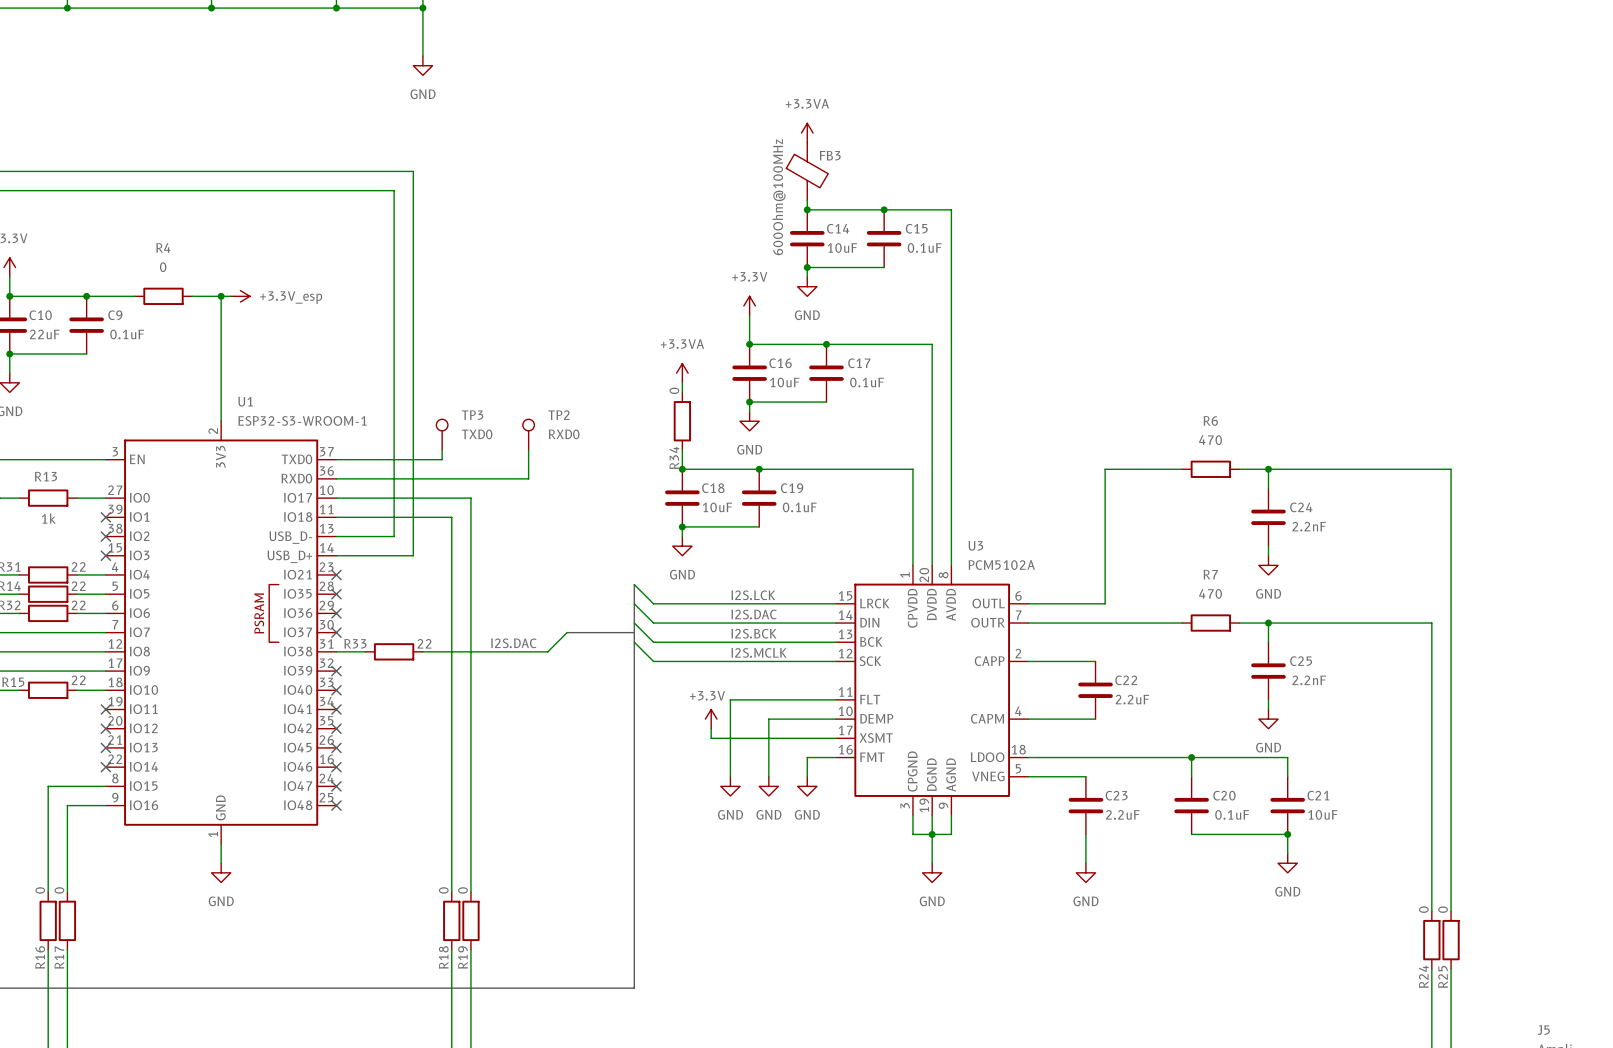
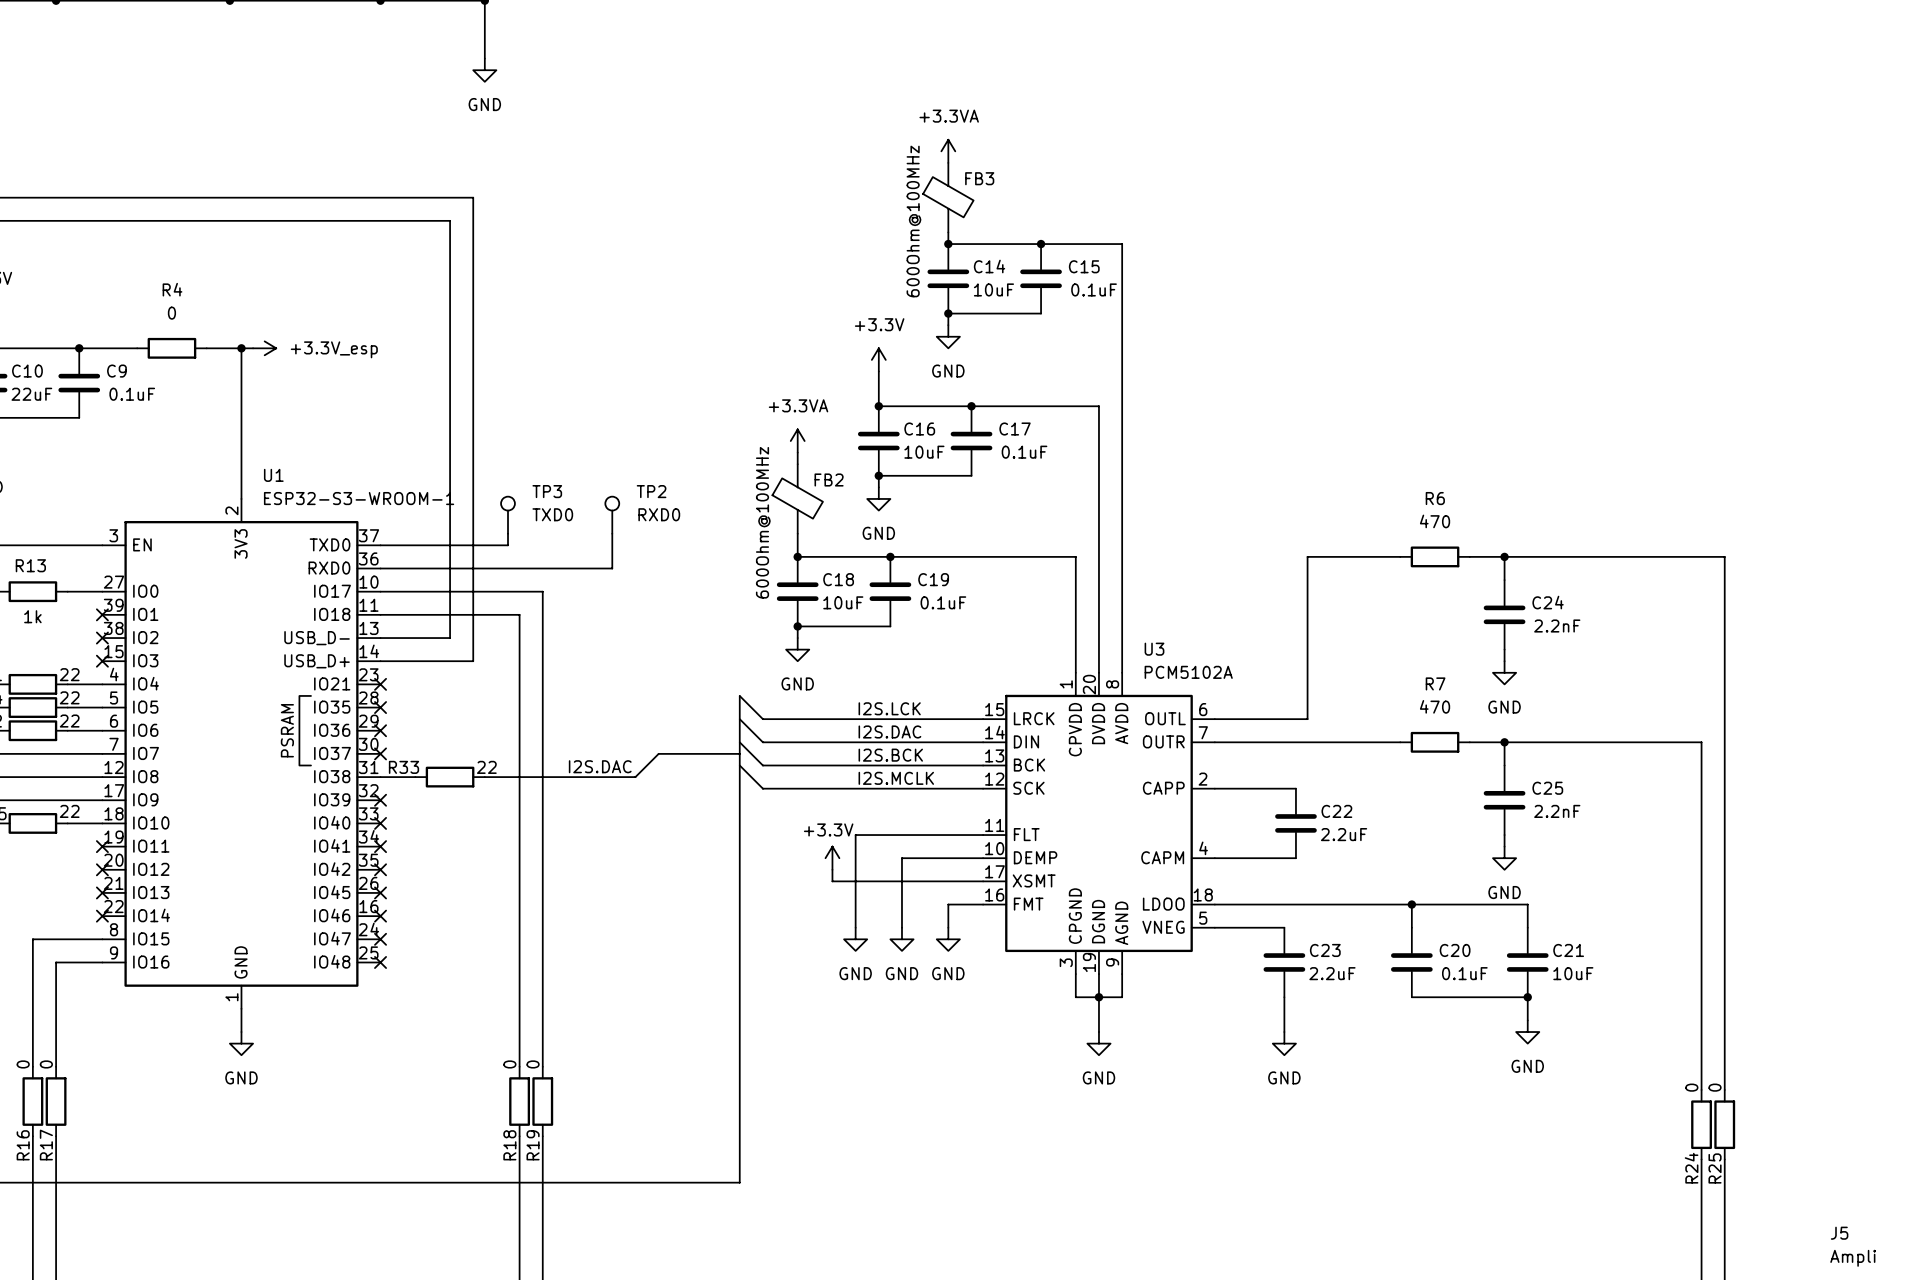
R34: 0 (682, 421) -> none
FB2: none -> 600Ohm@100MHz (797, 498)

